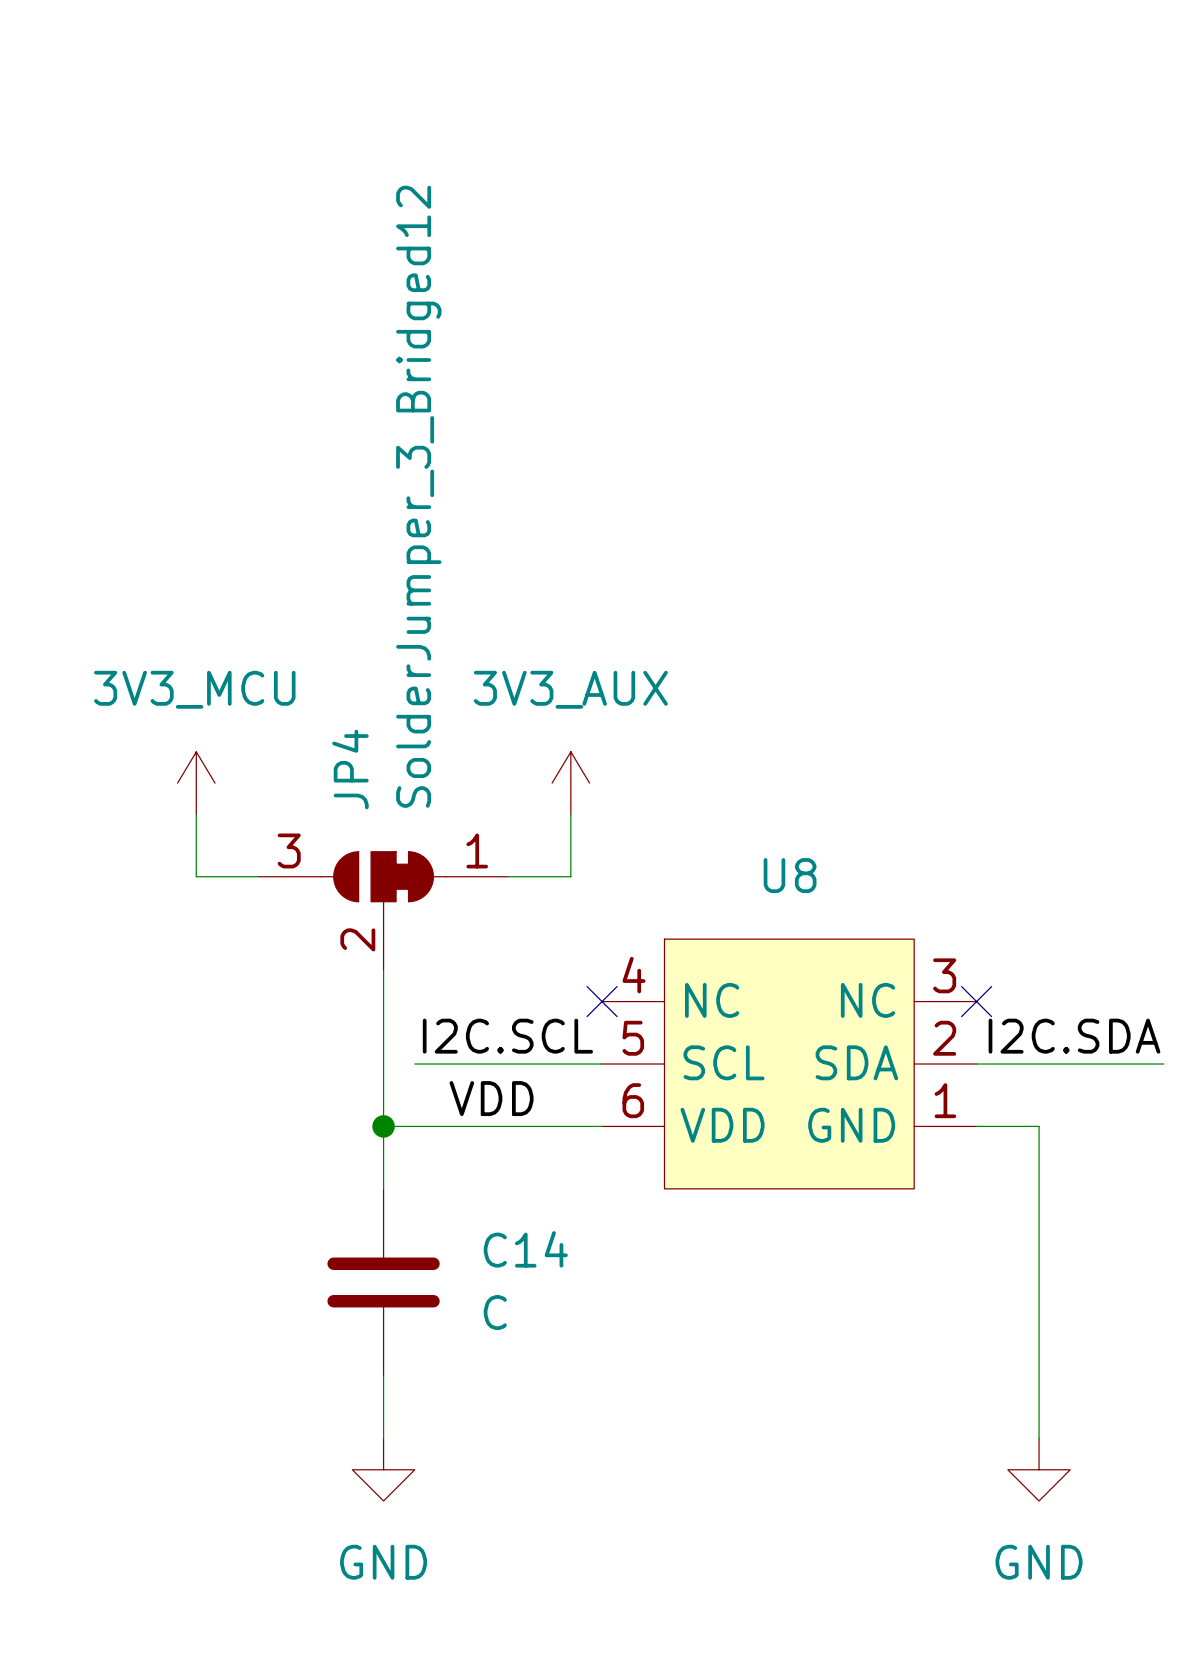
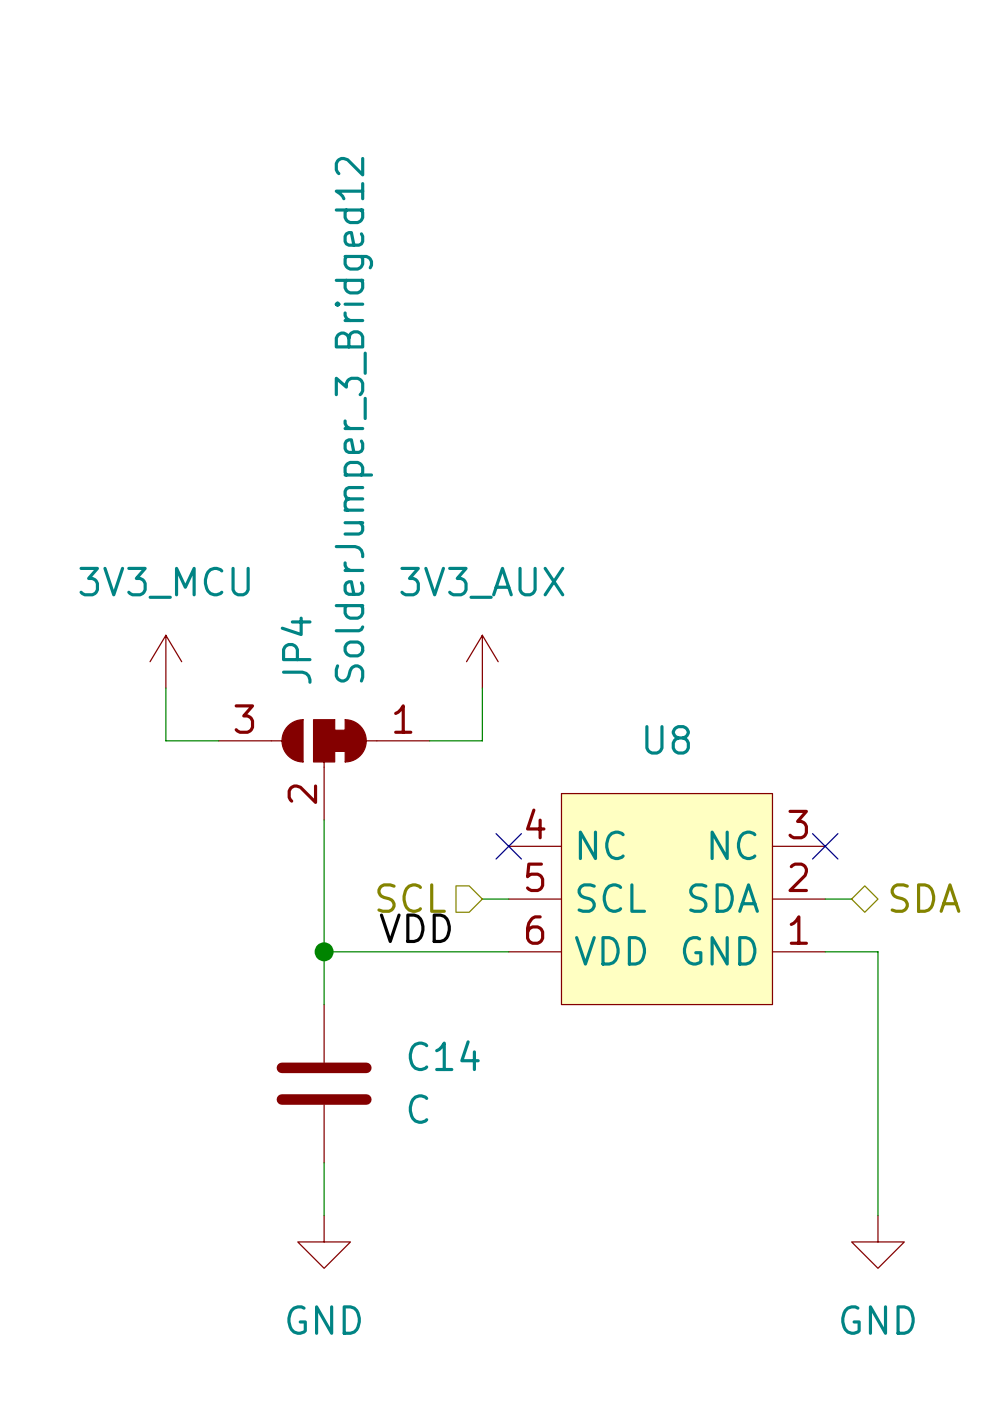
label: I2C.SCL (507, 1036) -> none
label: I2C.SDA (1074, 1036) -> none
hierarchical label: none -> SCL (411, 898)
hierarchical label: none -> SDA (925, 898)
wire: (414, 1064) (570, 1064) -> none
wire: (1007, 1064) (1163, 1064) -> none

